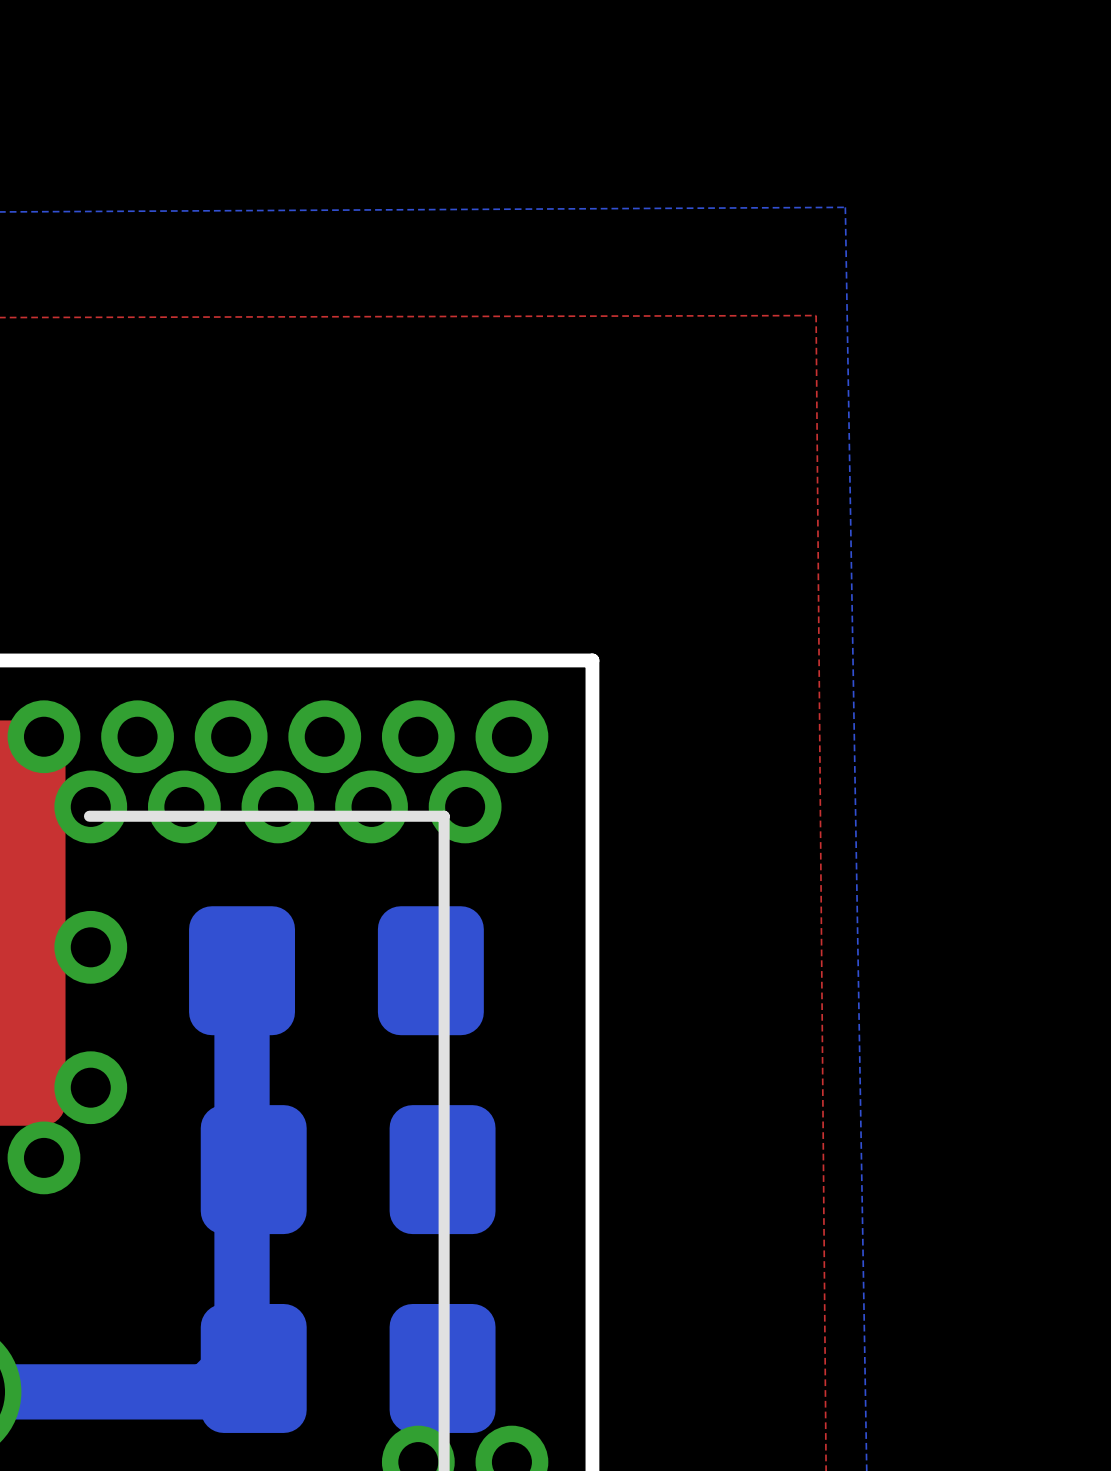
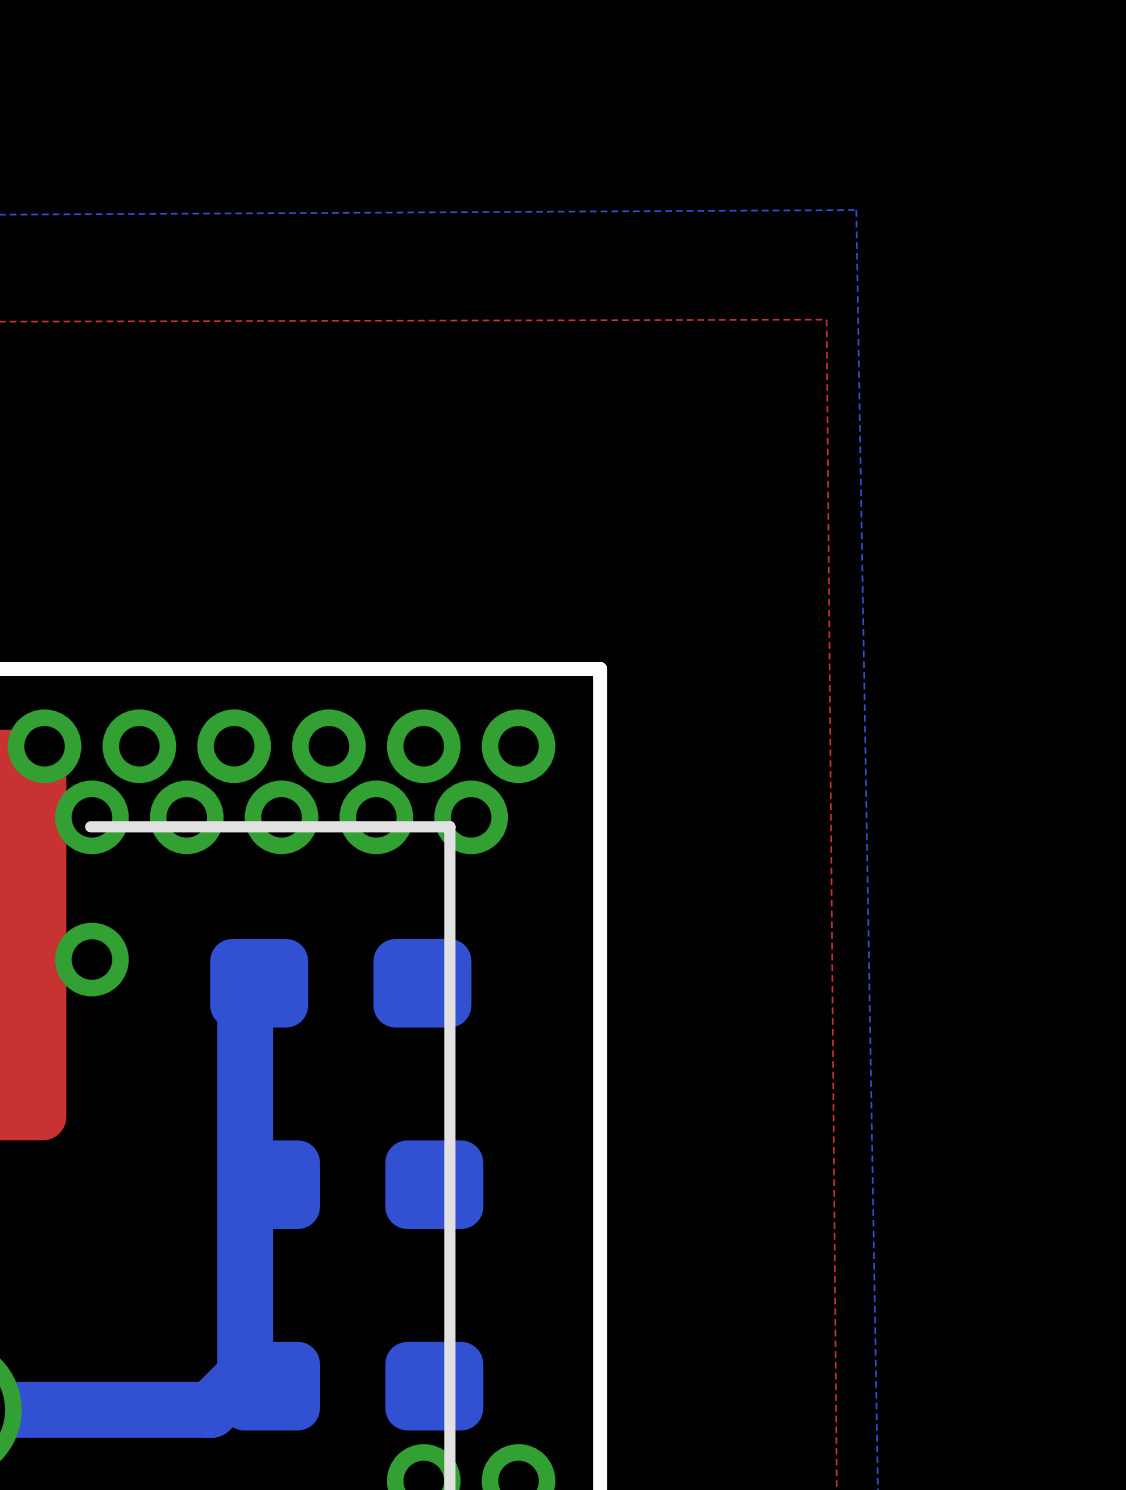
part footprint: [189, 906, 484, 1036] -> [210, 938, 472, 1028]
via: (90, 1087) -> none
part footprint: [200, 1105, 496, 1235] -> [222, 1140, 484, 1230]
via: (43, 1157) -> none
part footprint: [200, 1304, 496, 1433] -> [222, 1341, 484, 1431]

